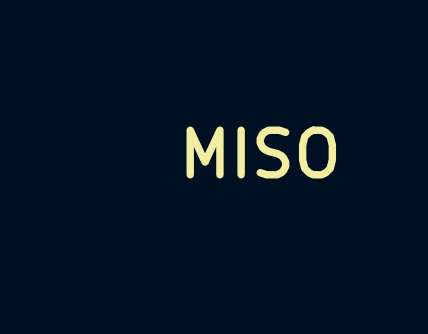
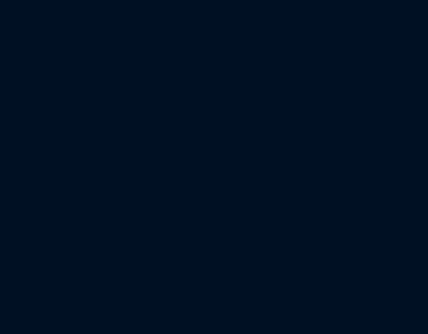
text: MISO (261, 152) -> none

